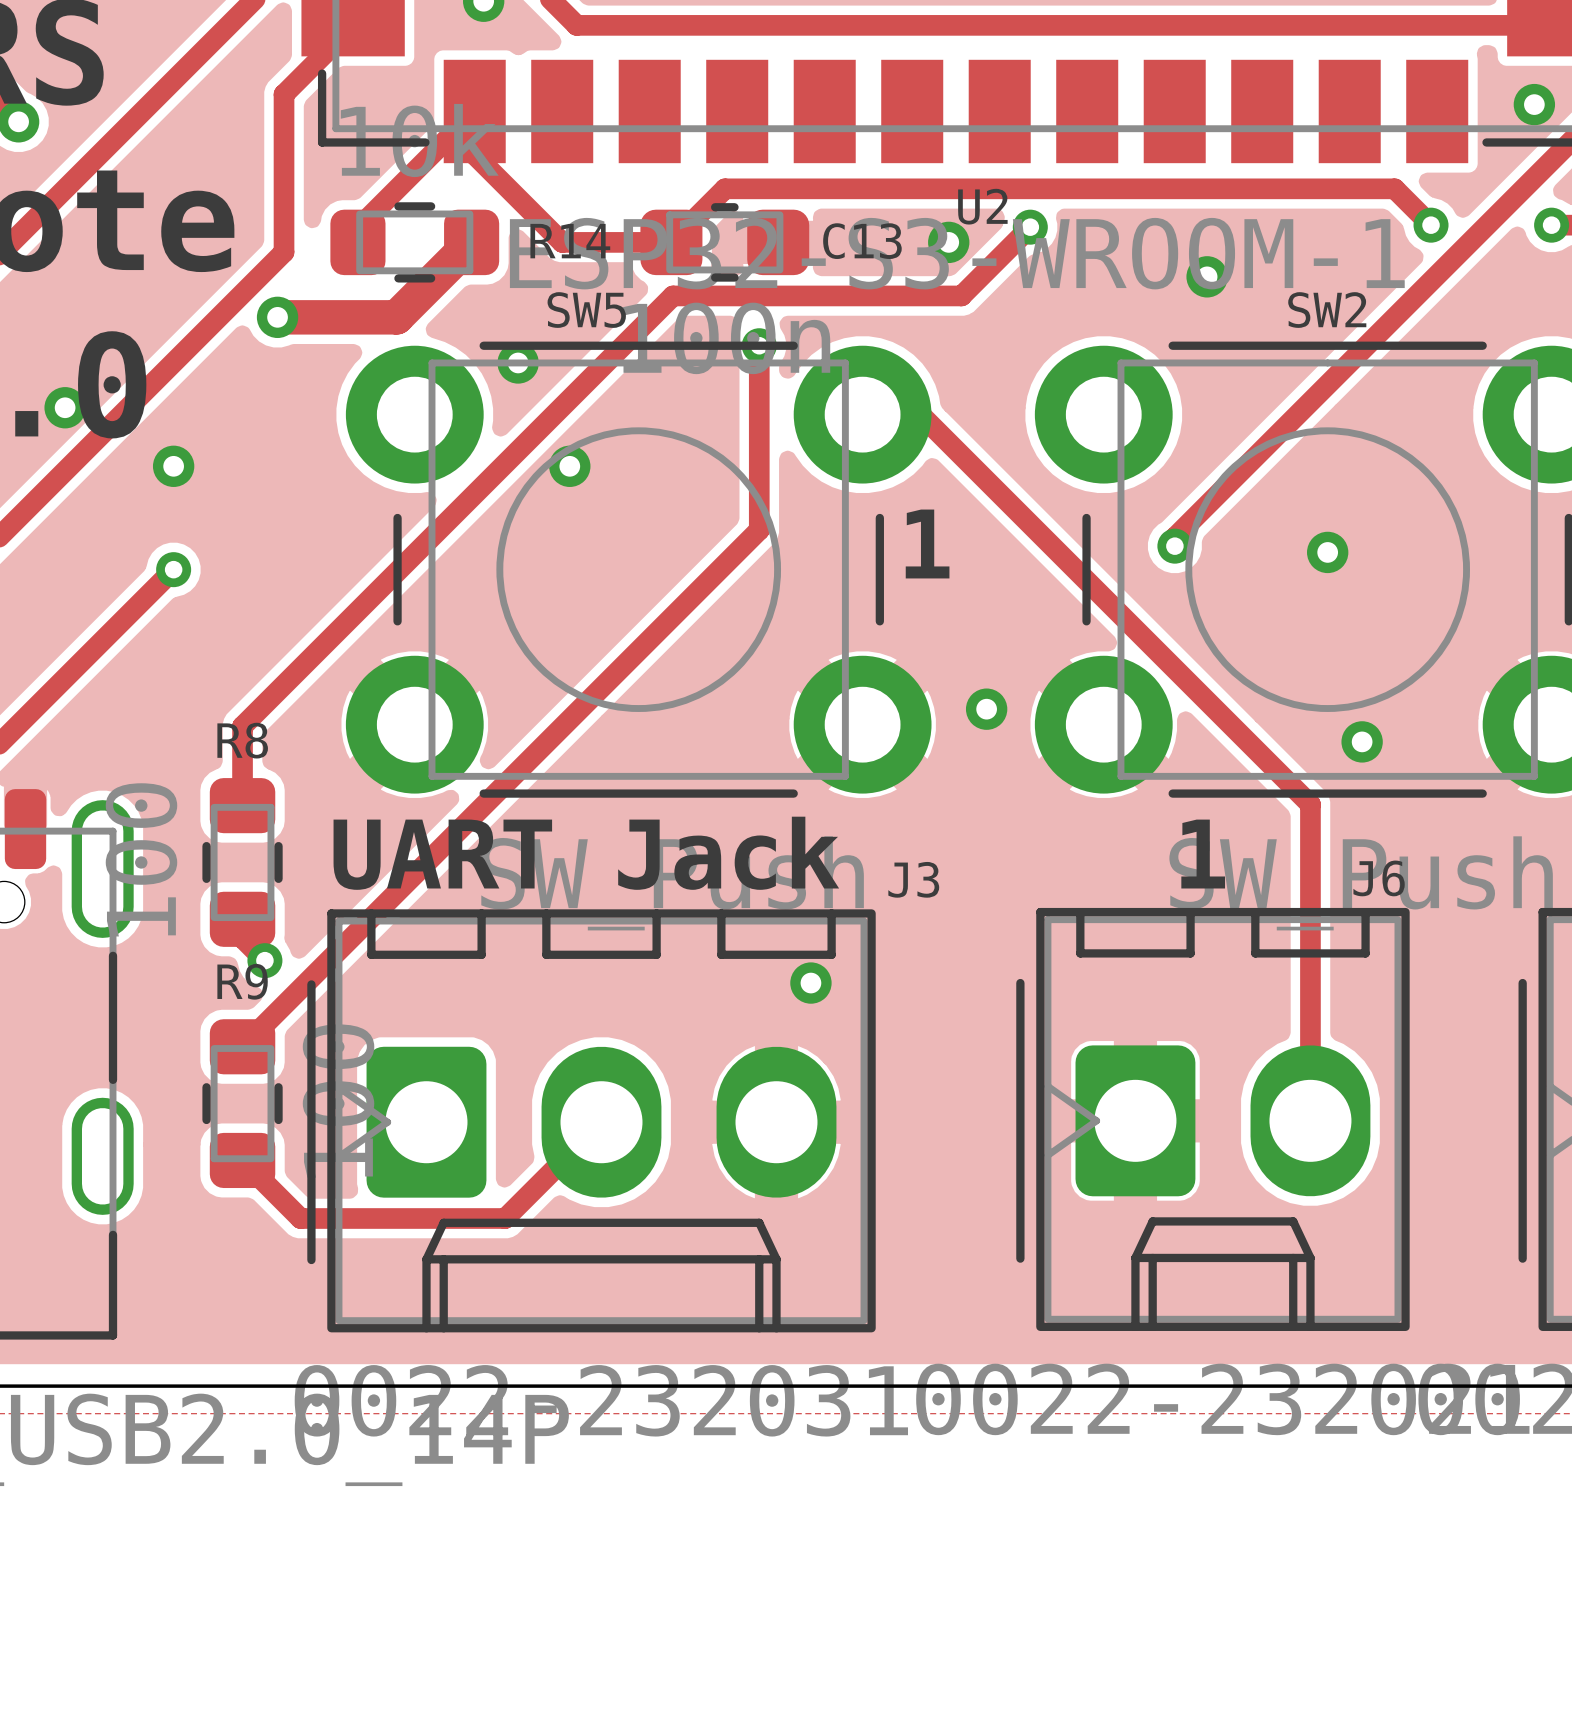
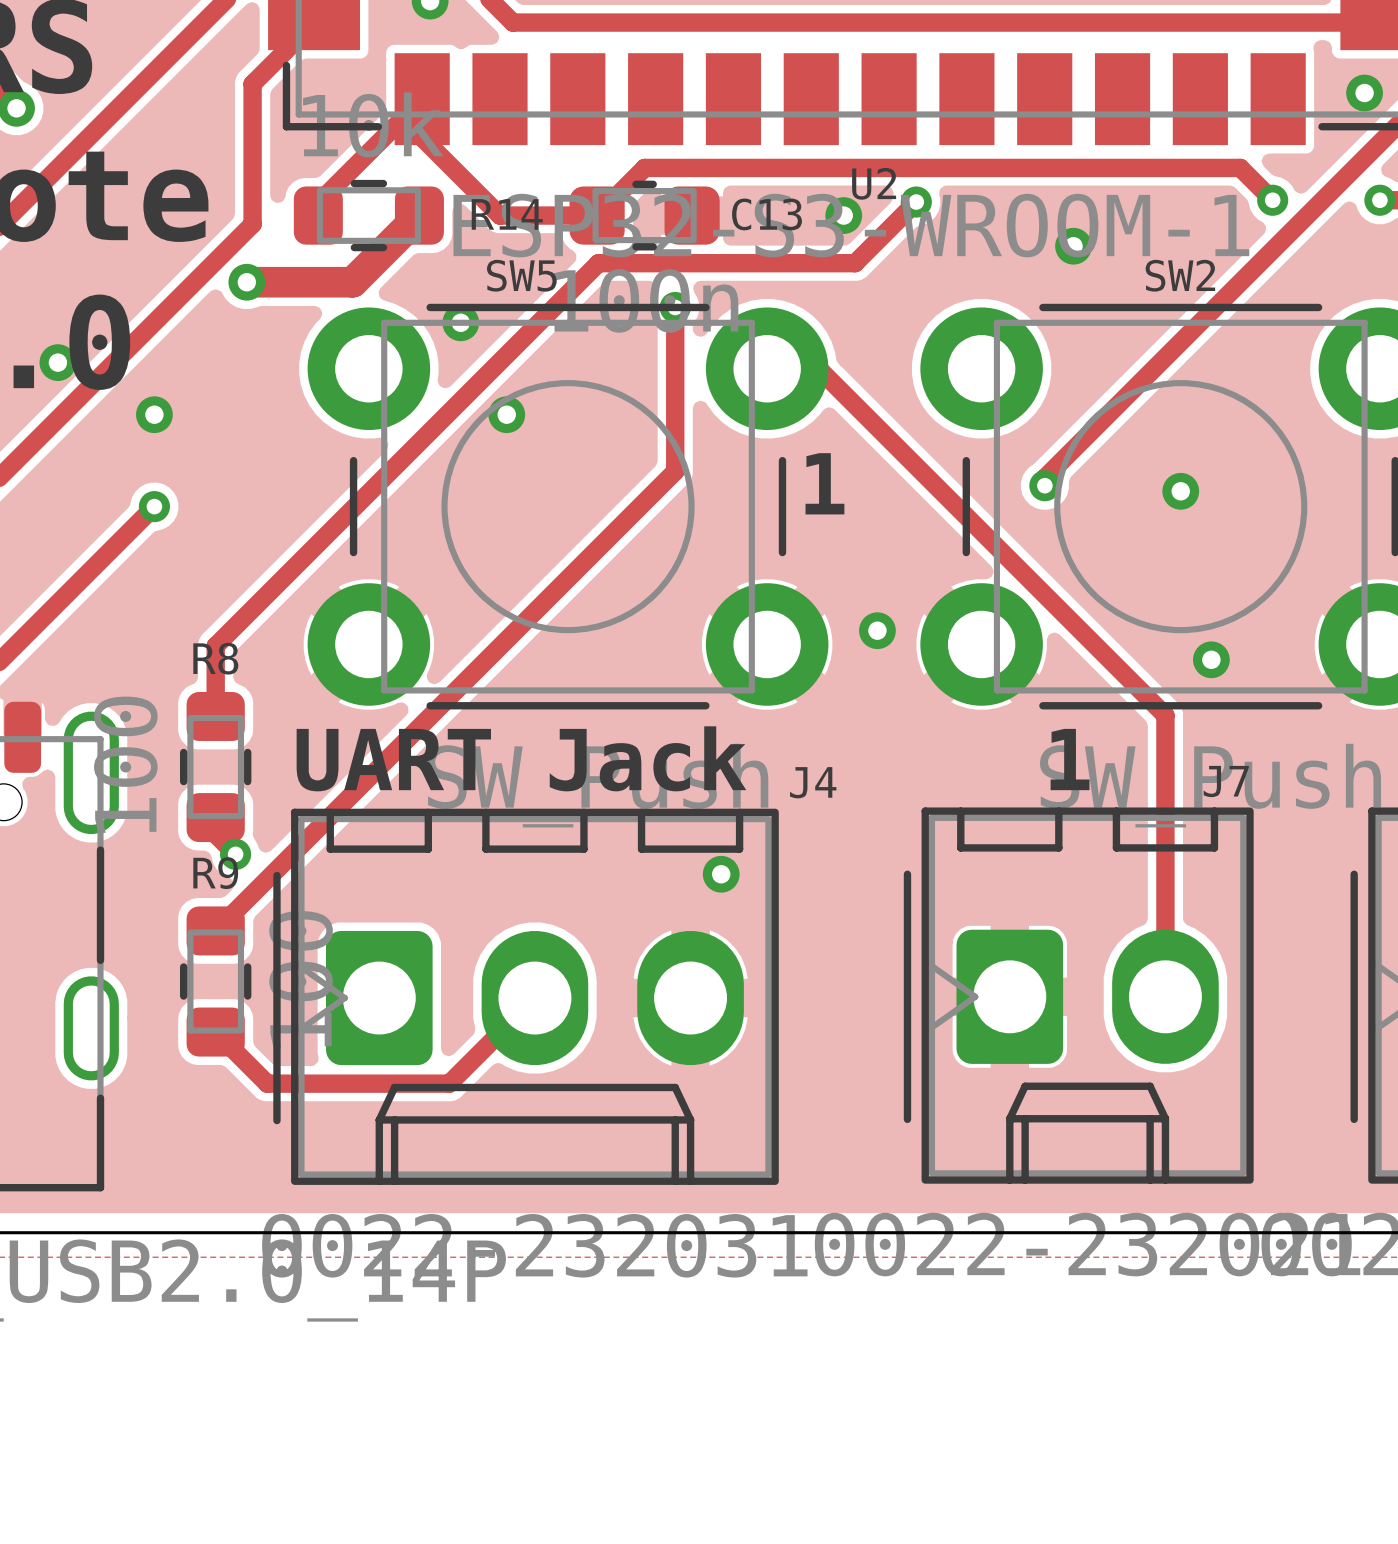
J6 name: J6 (1379, 878) -> J7 (1226, 781)
J3 name: J3 (913, 879) -> J4 (813, 782)

